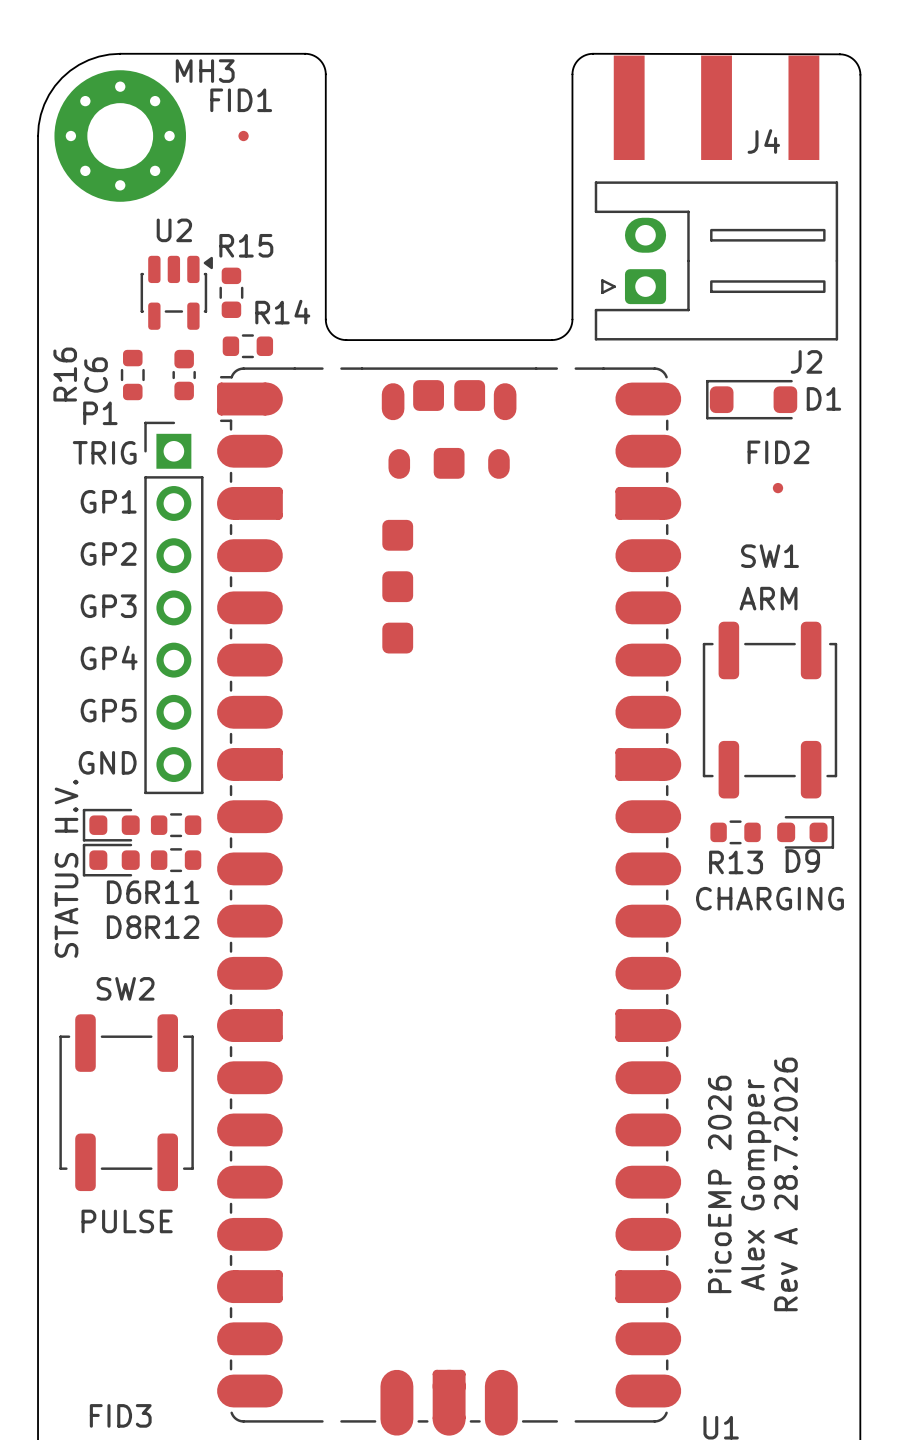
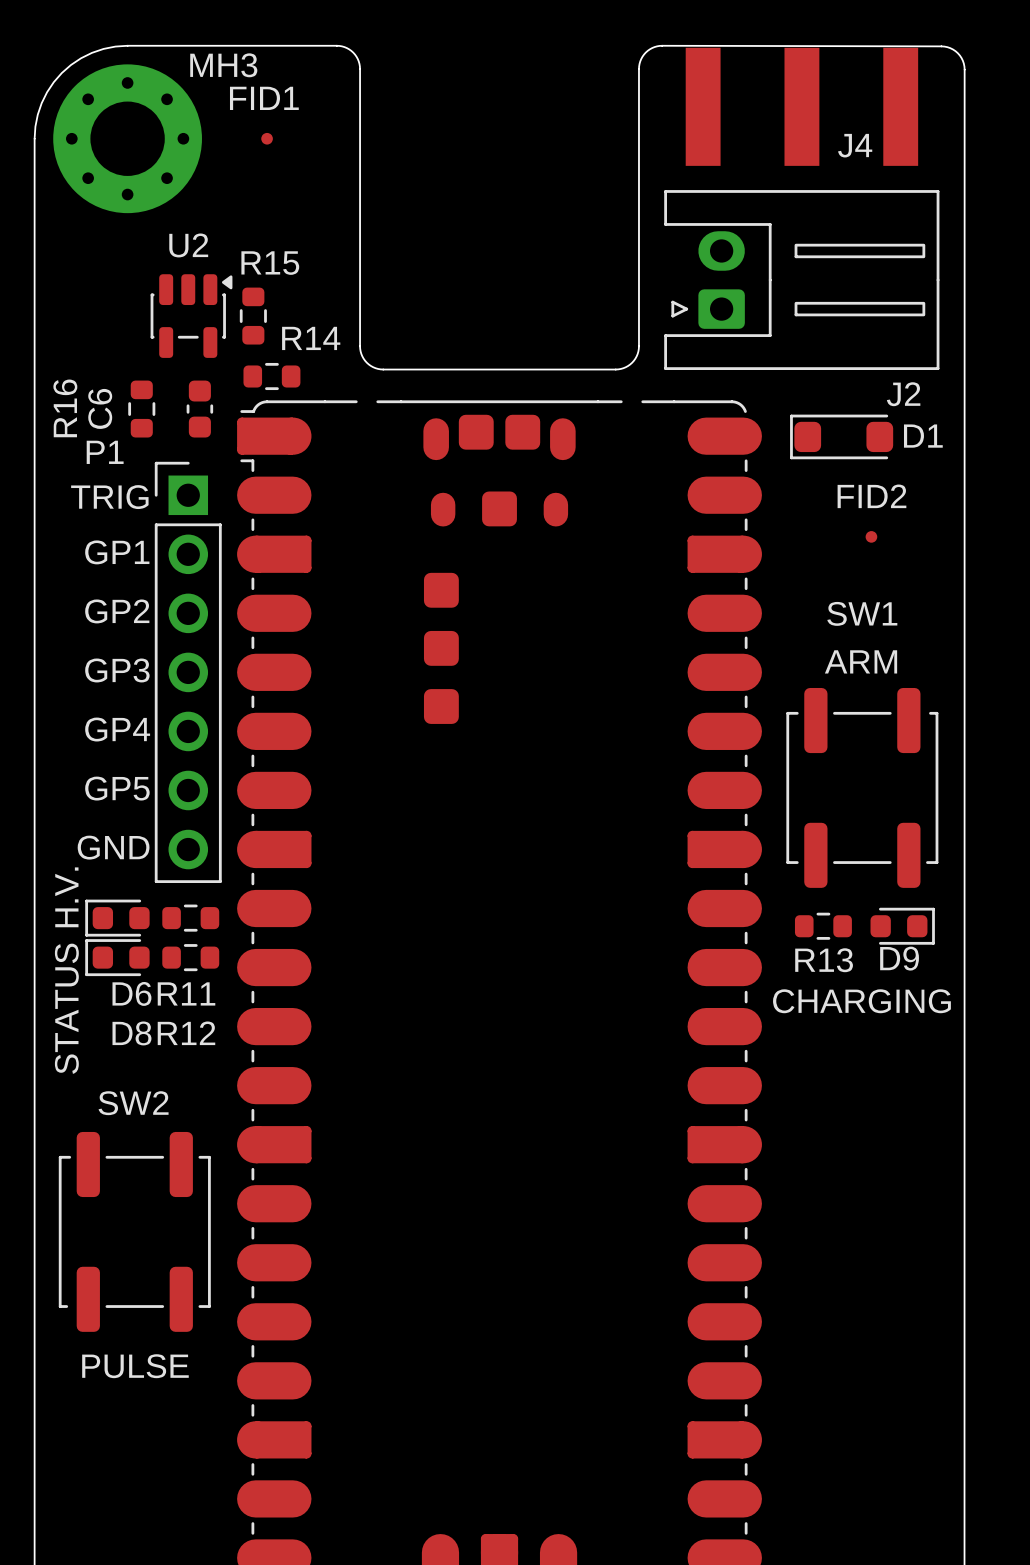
text: PicoEMP 2026 (719, 1184) -> none
text: Alex Gompper (756, 1184) -> none
text: Rev A 28.7.2026 (785, 1184) -> none

